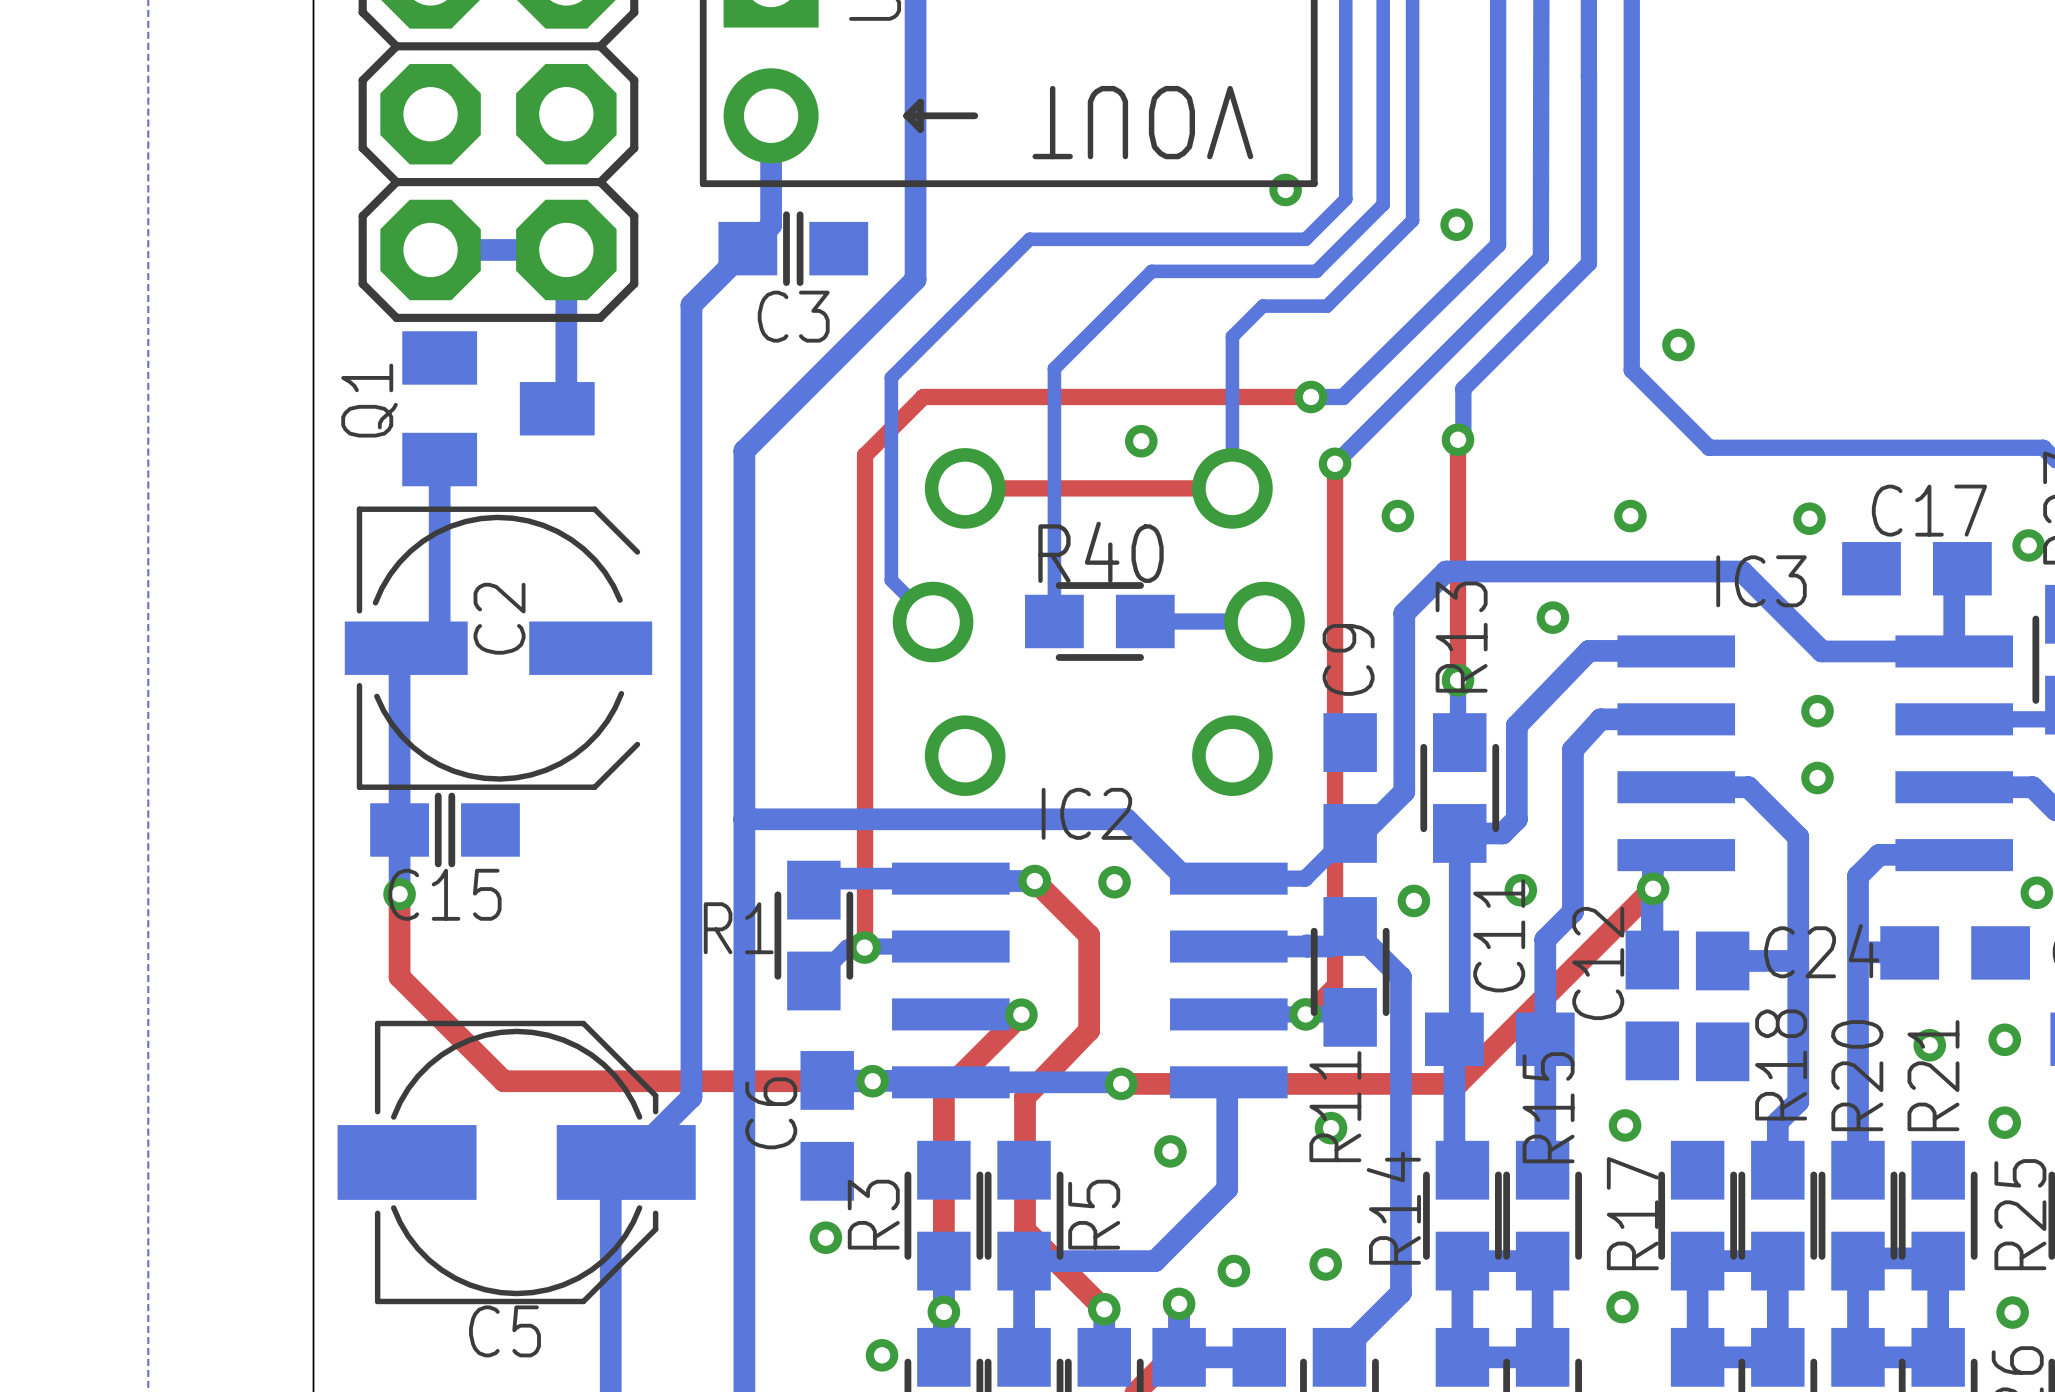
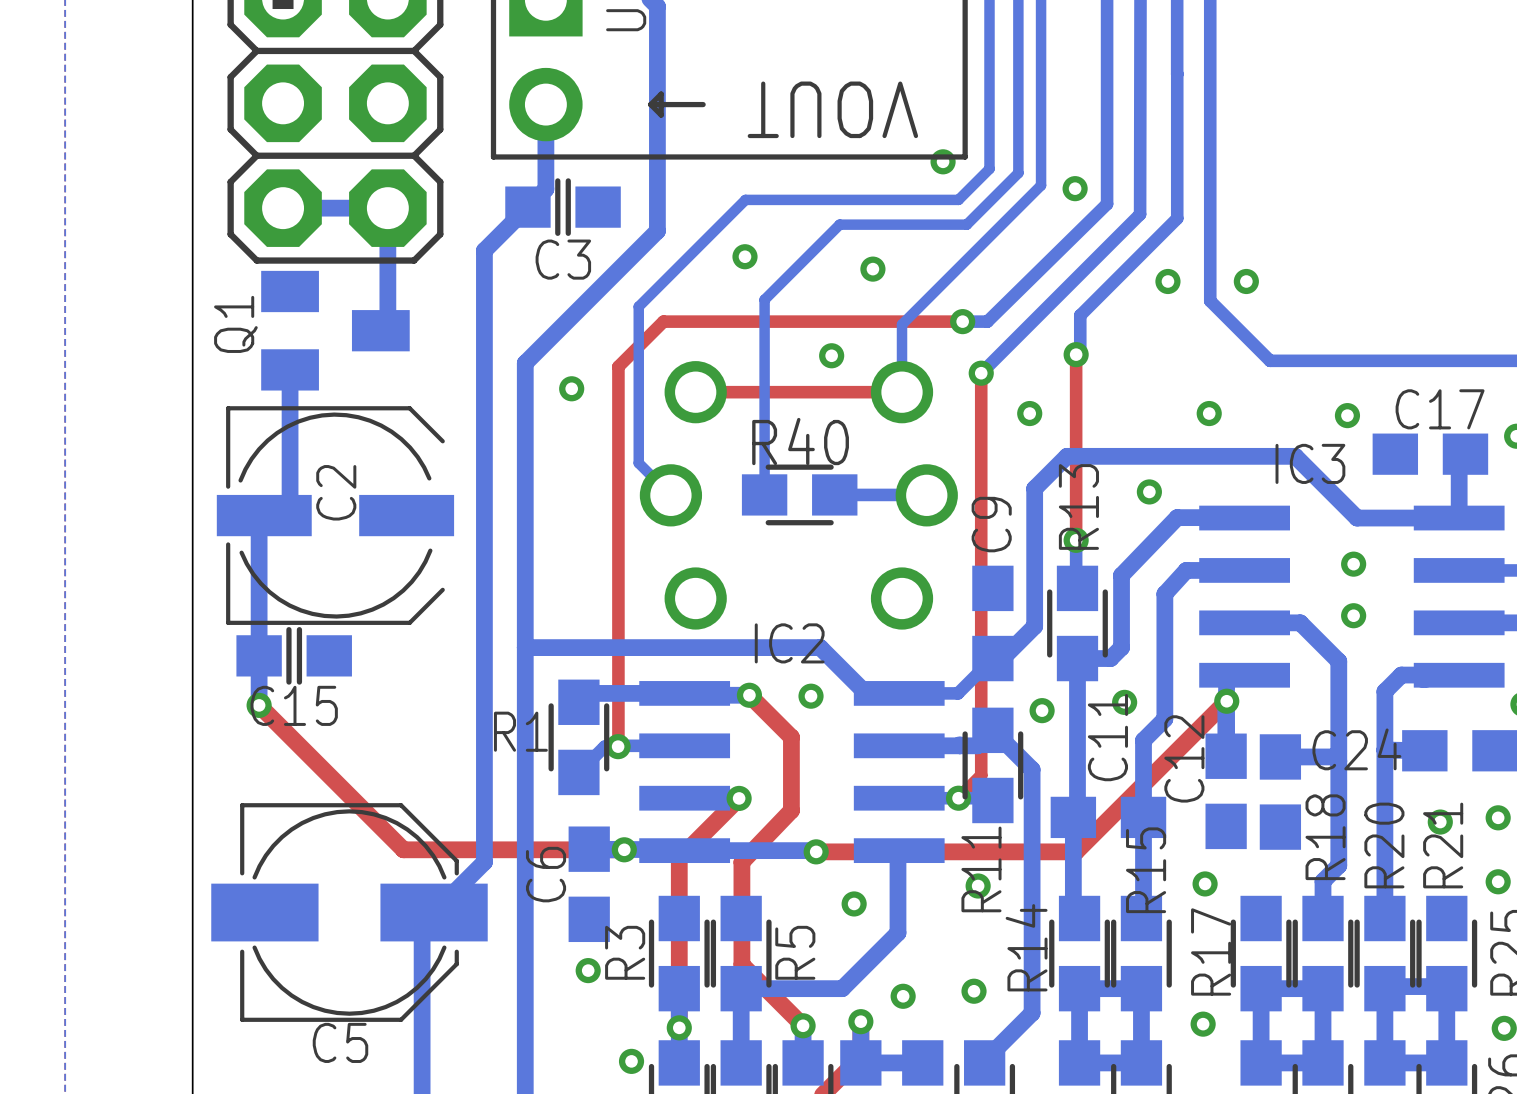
bottom track: (1327, 306) (1262, 306) (1232, 336) (1232, 400) -> (975, 251) (902, 324)
via: none -> (745, 256)
via: none -> (872, 269)
via: none -> (1167, 281)
via: none -> (571, 388)
top track: (399, 894) (399, 976) (503, 1081) (586, 1081) -> (259, 705) (403, 849)

